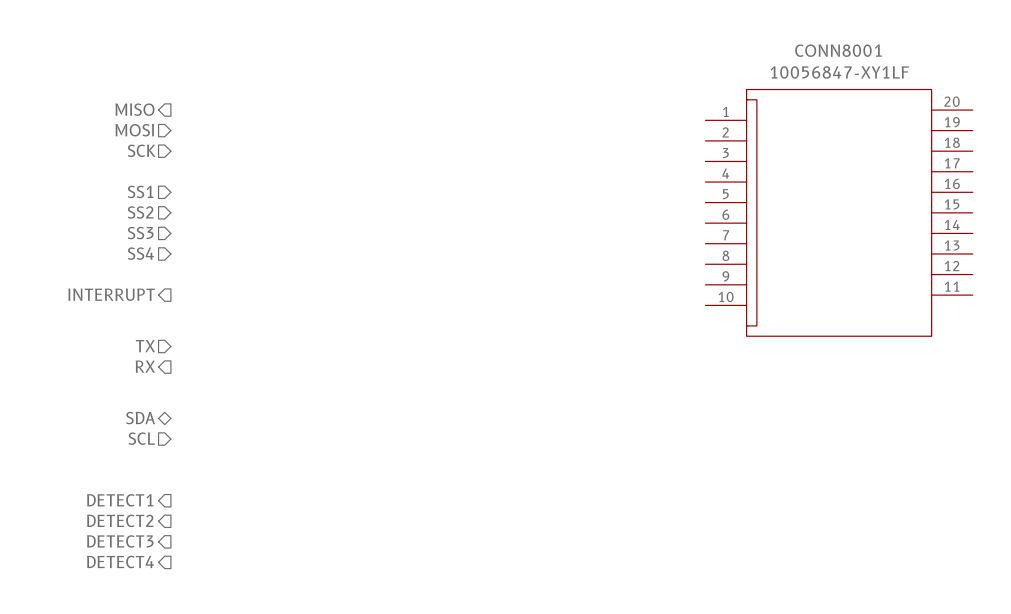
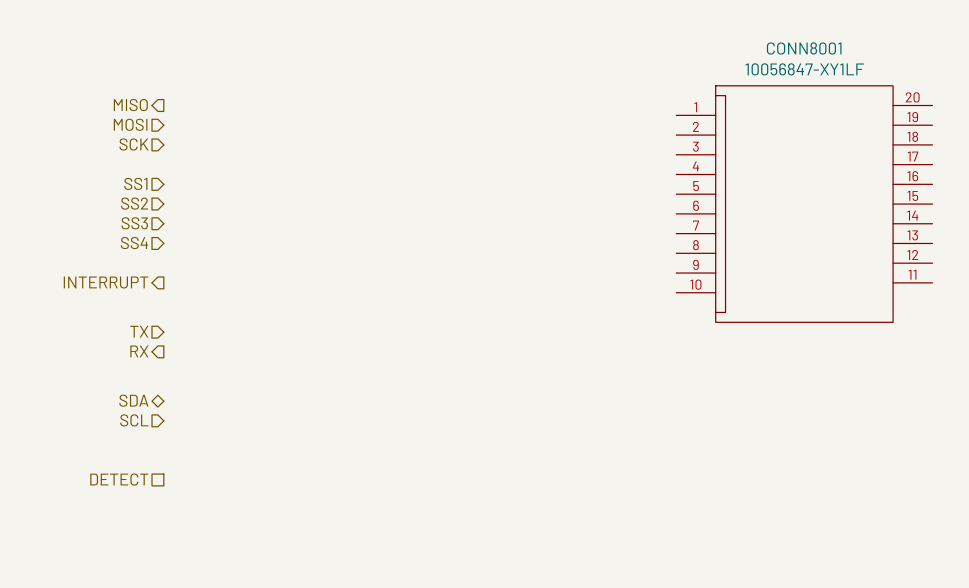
hierarchical label shape: output (120, 500) -> passive (119, 479)
hierarchical label: DETECT1 (120, 500) -> DETECT (119, 479)
hierarchical label: DETECT2 (120, 520) -> none
hierarchical label: DETECT3 (120, 541) -> none
hierarchical label: DETECT4 (120, 562) -> none

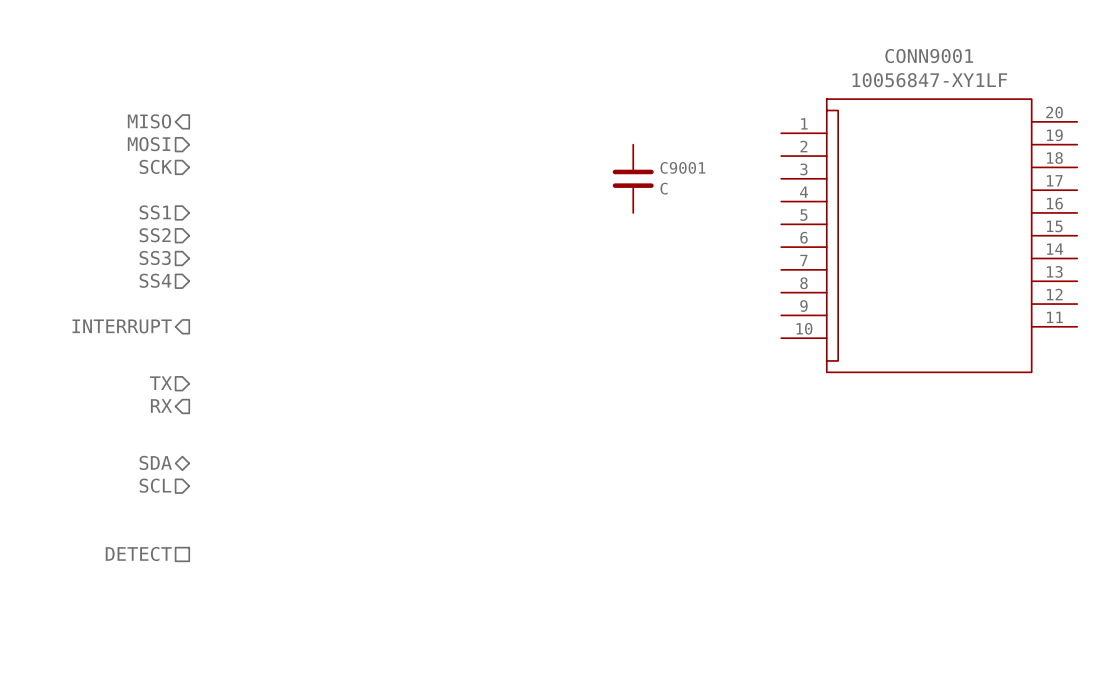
CONN8001 name: CONN8001 (804, 48) -> CONN9001 (929, 56)
C9001: none -> C (633, 178)

